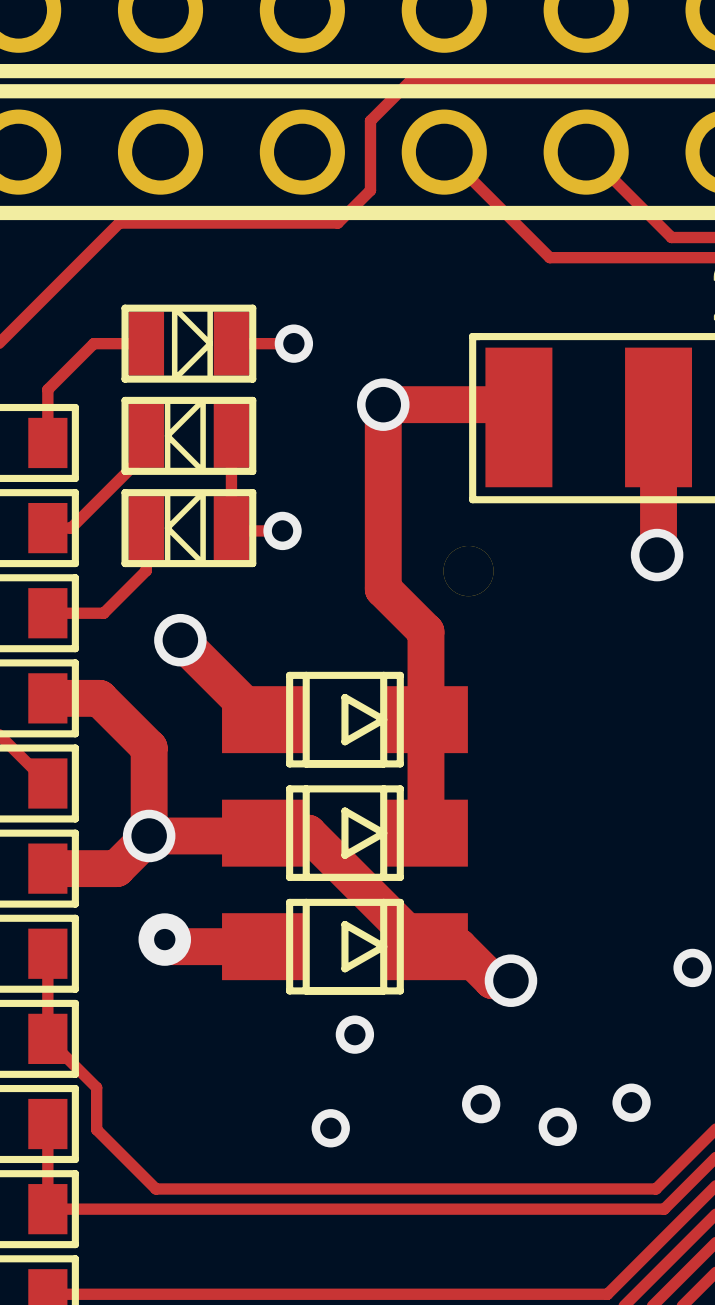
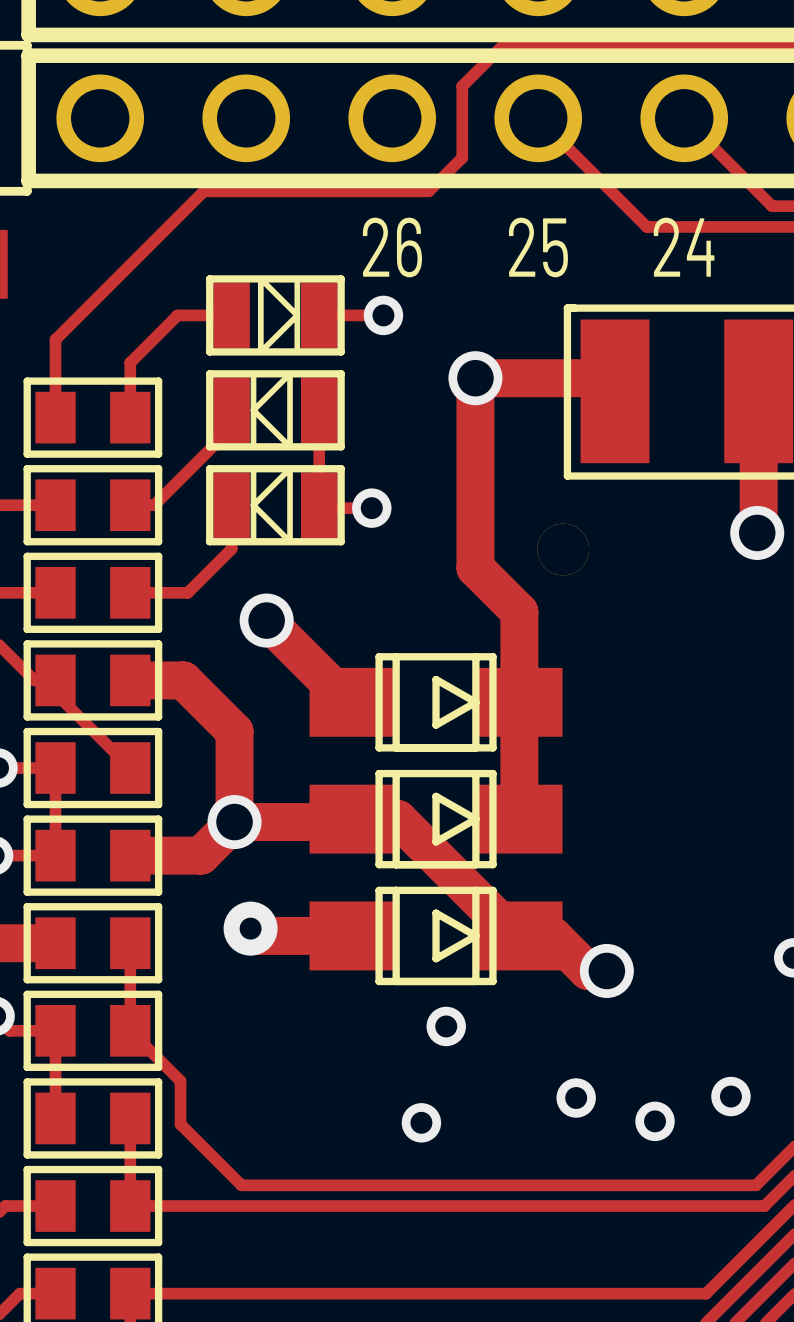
text: none -> 26 (392, 247)
text: none -> 25 (538, 247)
text: none -> 24 (684, 247)

